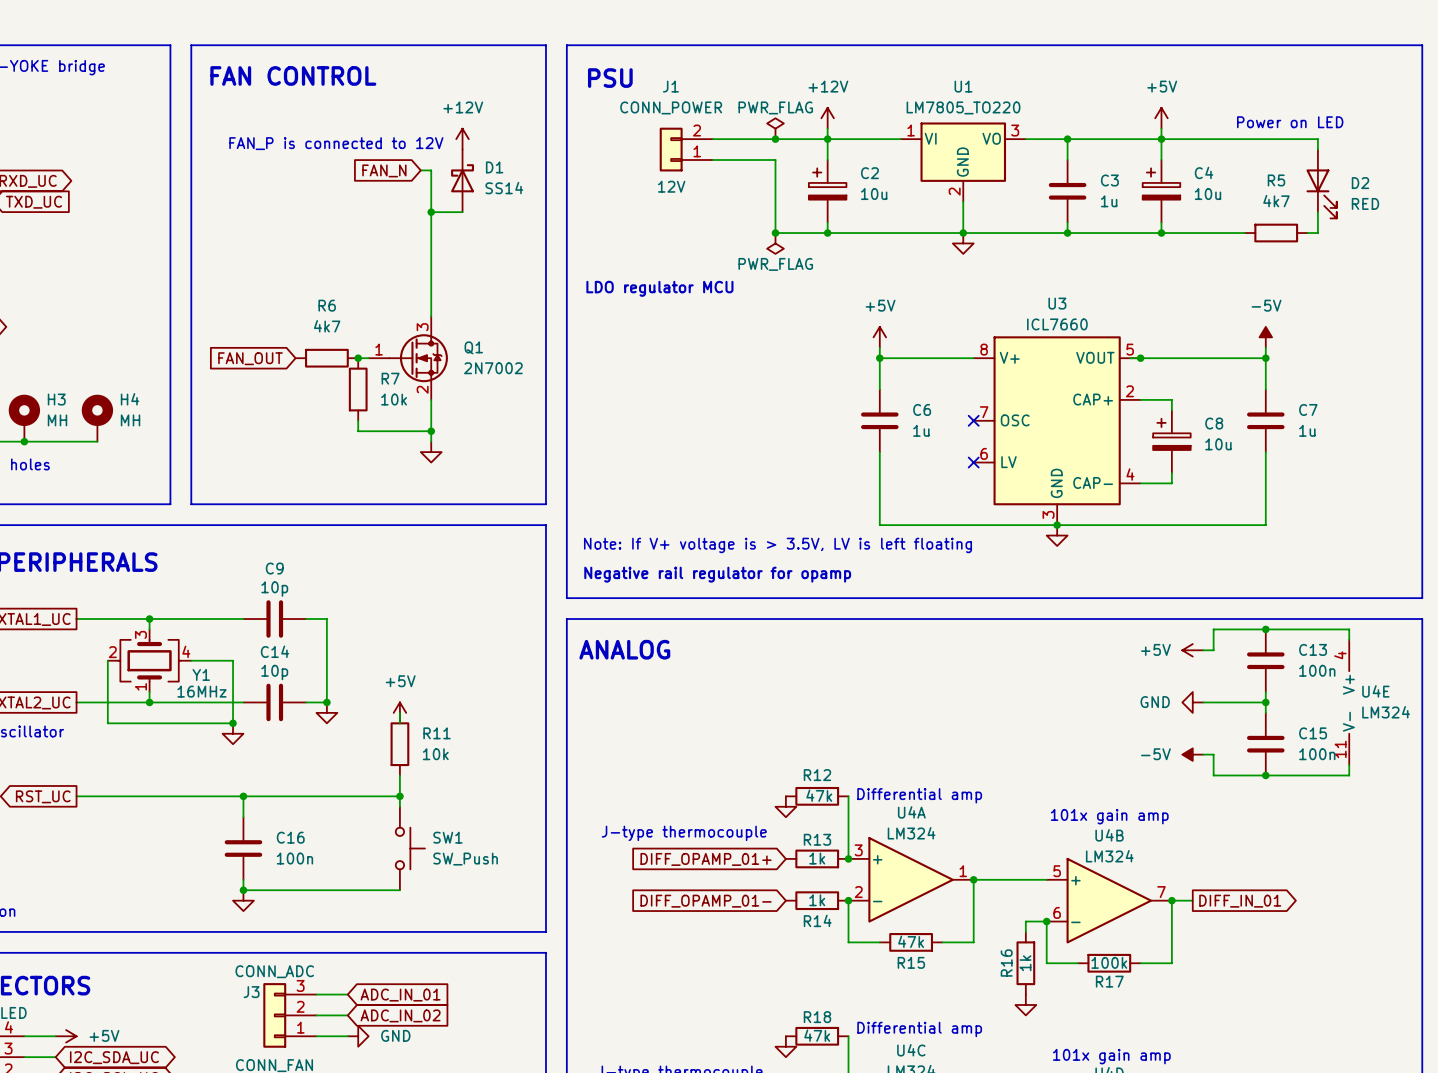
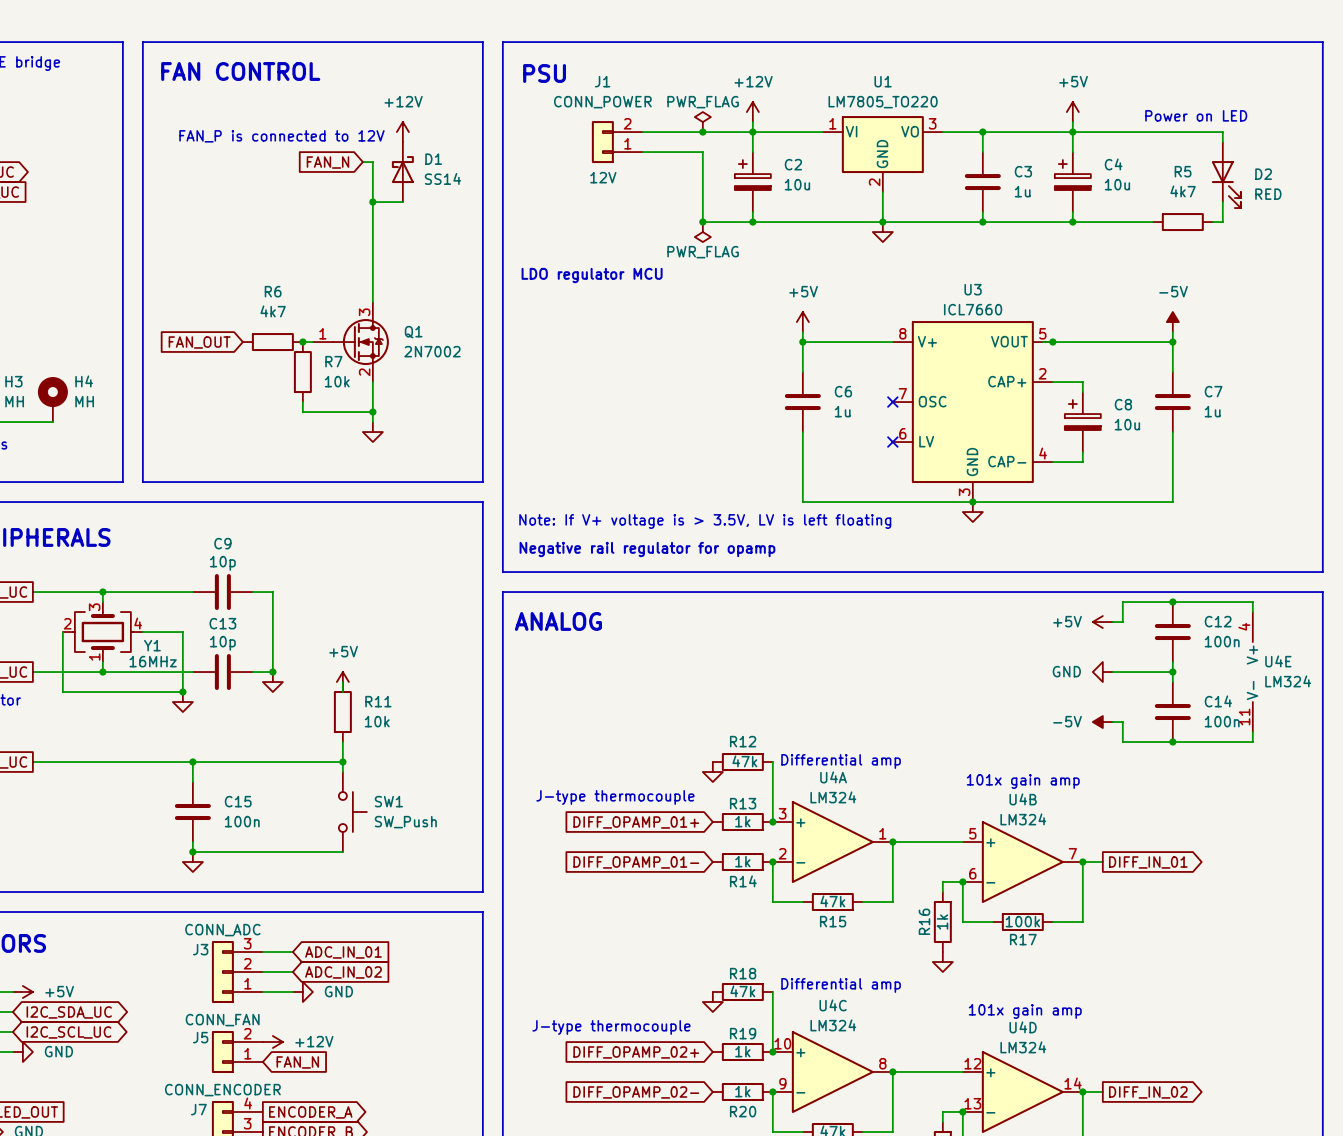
C13 name: C13 (1313, 649) -> C12 (1218, 621)
C14 name: C14 (275, 651) -> C13 (222, 623)
C15 name: C15 (1313, 733) -> C14 (1218, 701)
C16 name: C16 (290, 837) -> C15 (238, 801)

